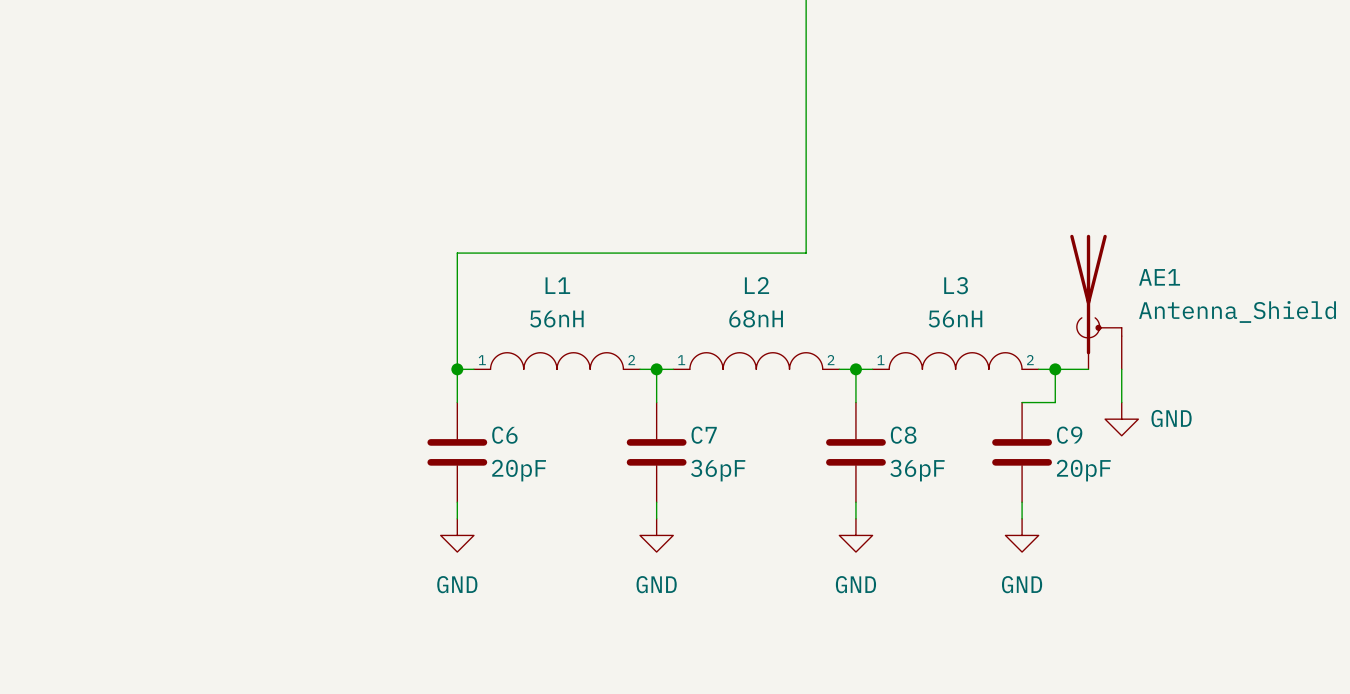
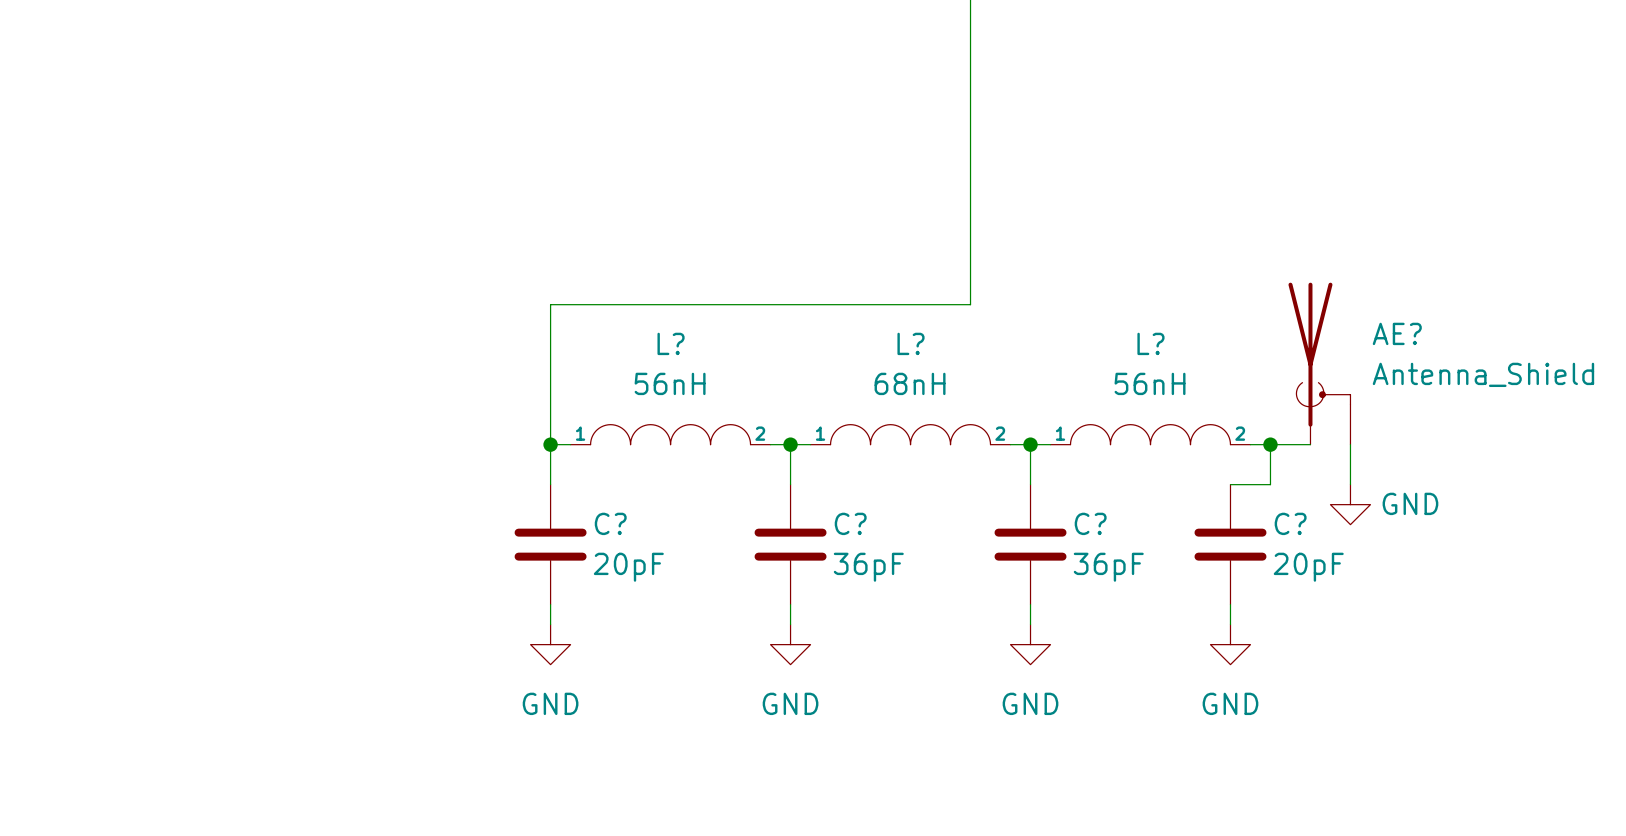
AE1 name: AE1 (1159, 277) -> AE? (1397, 333)
L1 name: L1 (557, 285) -> L? (671, 343)
L2 name: L2 (756, 285) -> L? (911, 343)
L3 name: L3 (956, 285) -> L? (1150, 343)
C6 name: C6 (504, 435) -> C? (610, 523)
C7 name: C7 (704, 435) -> C? (850, 523)
C8 name: C8 (903, 435) -> C? (1090, 523)
C9 name: C9 (1069, 435) -> C? (1290, 523)

